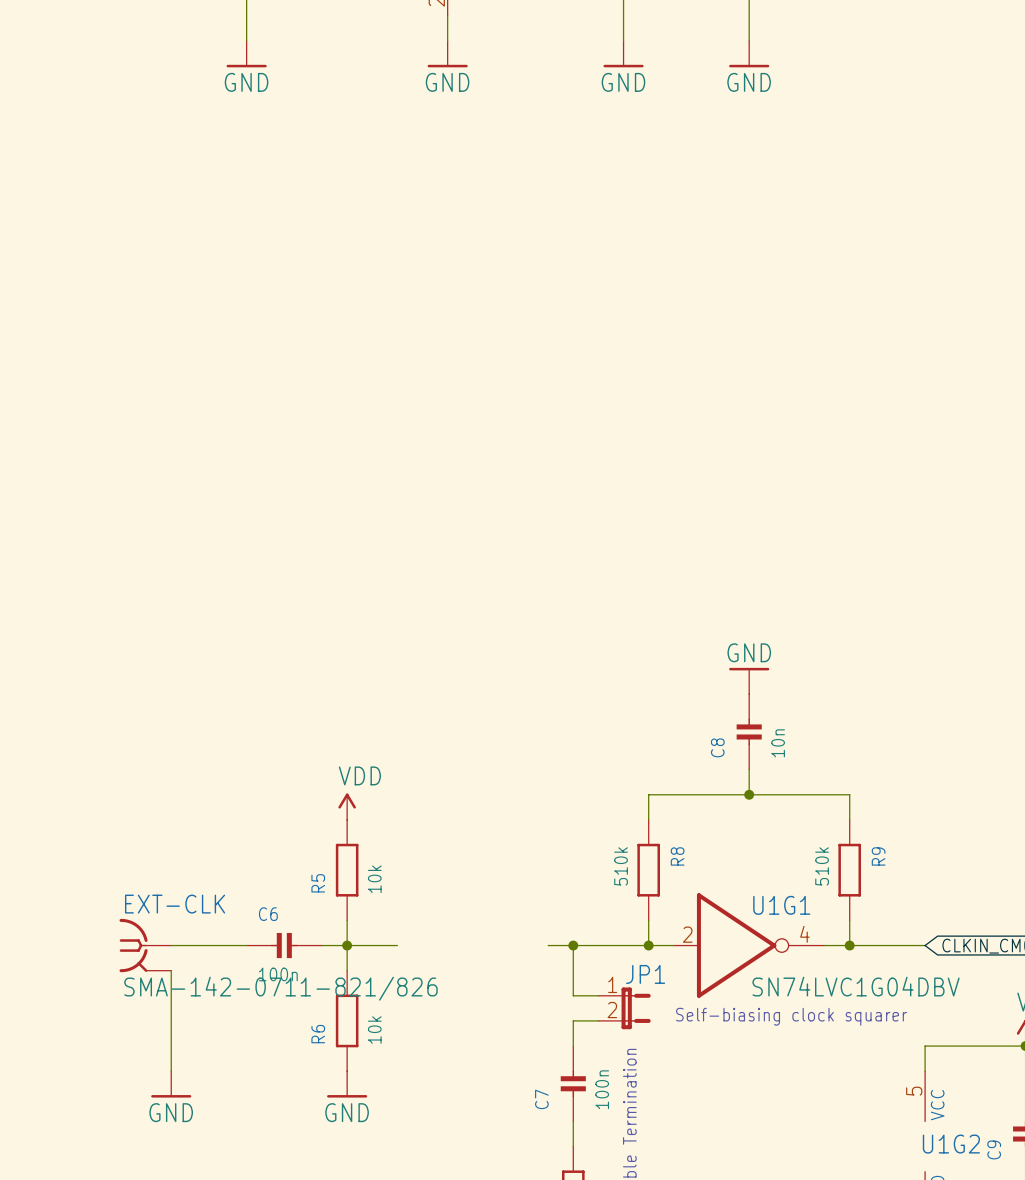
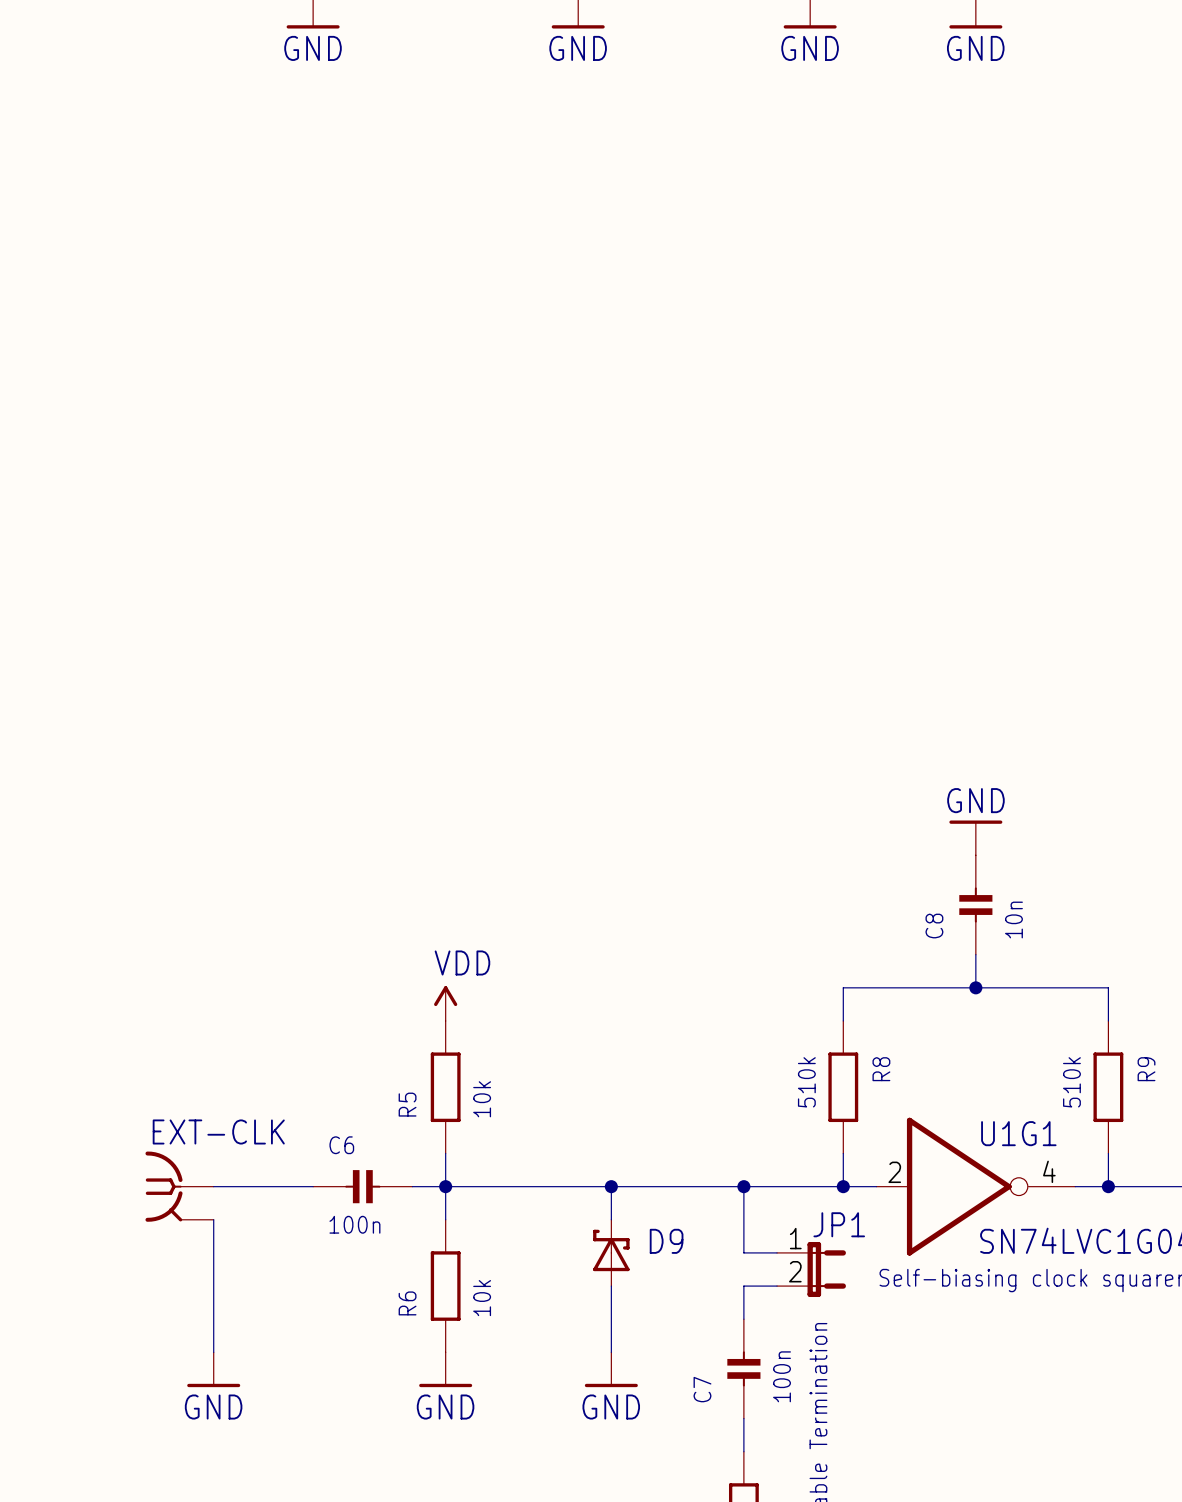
wire: none -> (511, 1186) (710, 1186)
wire: none -> (611, 1186) (611, 1219)
junction: none -> (611, 1186)
EXT-CLK value: SMA-142-0711-821/826 (280, 988) -> none
D9: none -> (611, 1252)
wire: none -> (611, 1286) (611, 1352)
power symbol: none -> GND (611, 1369)

